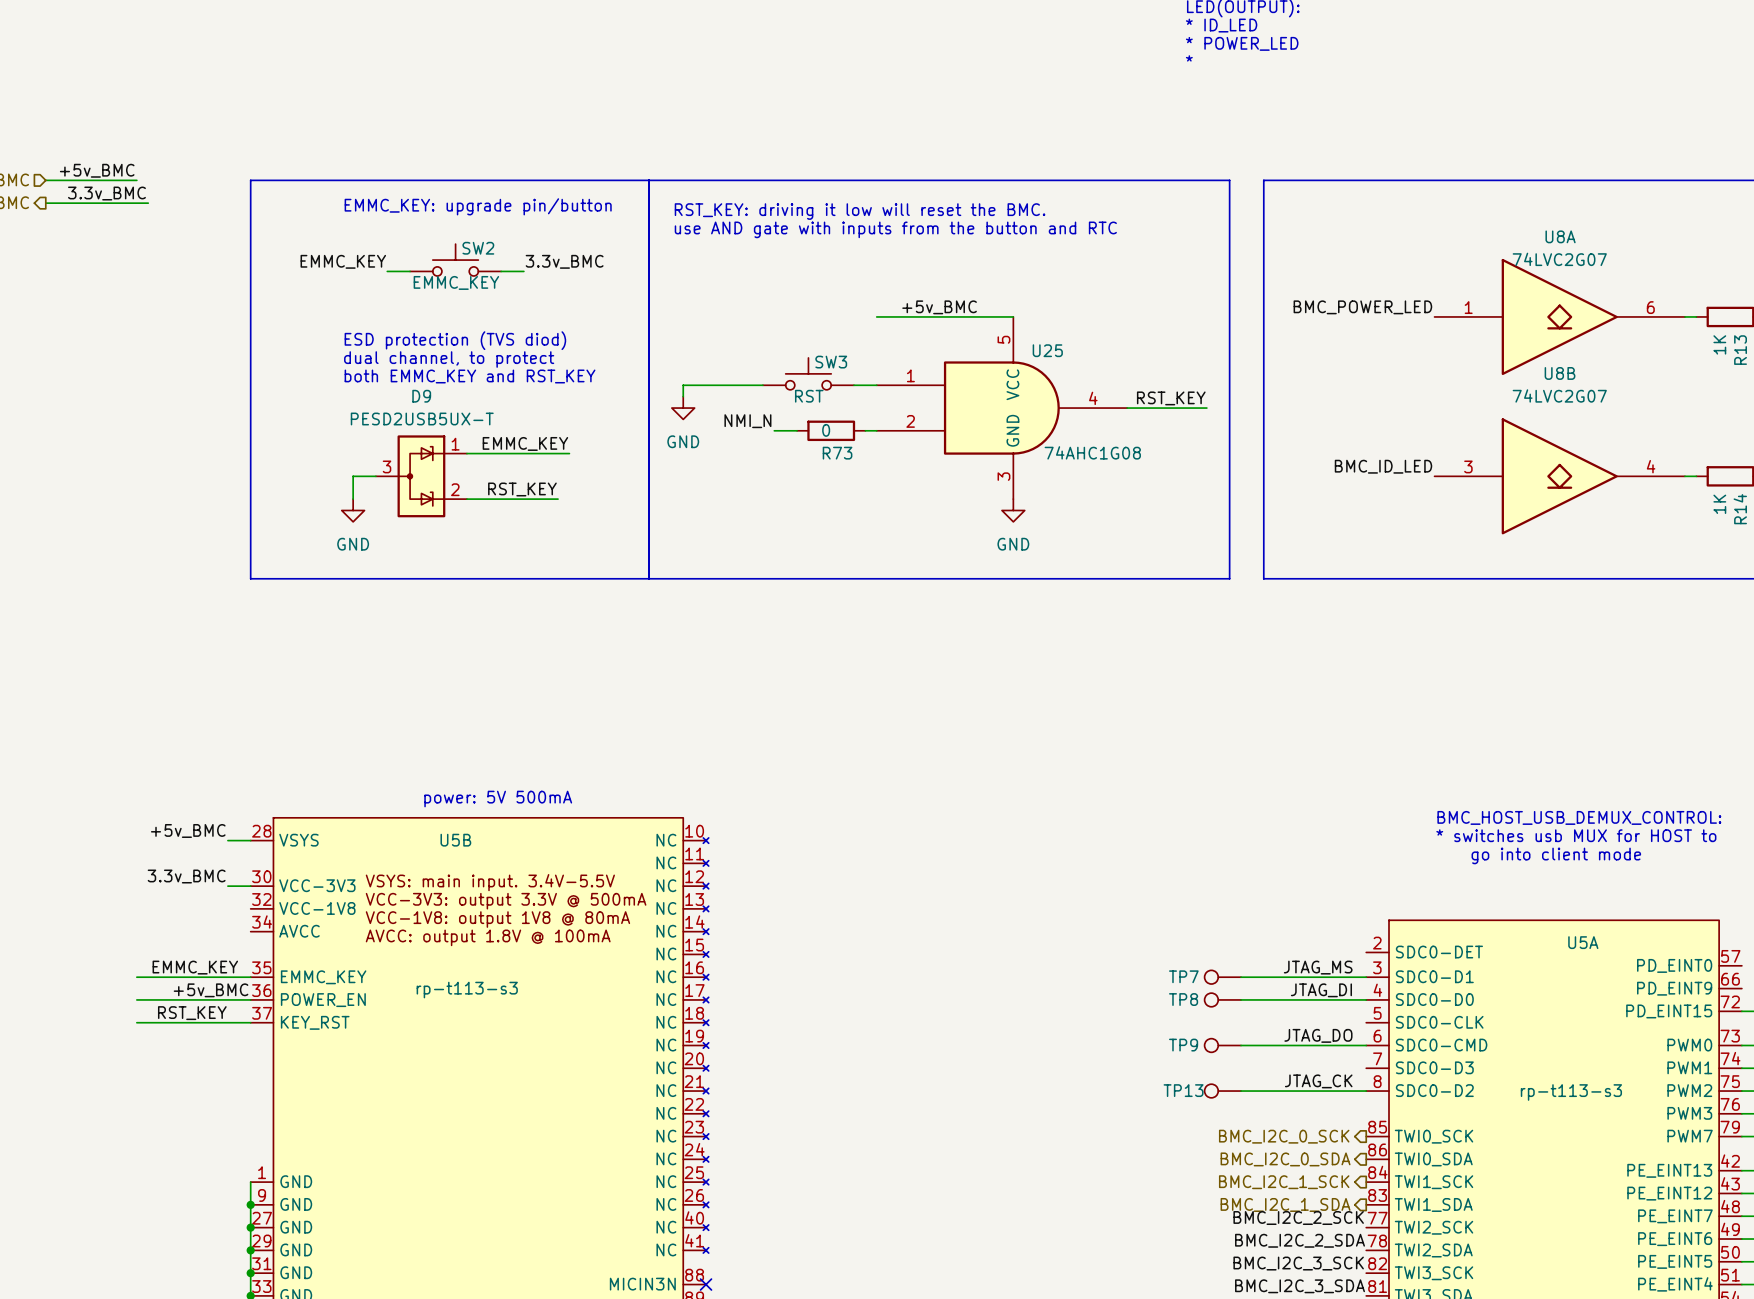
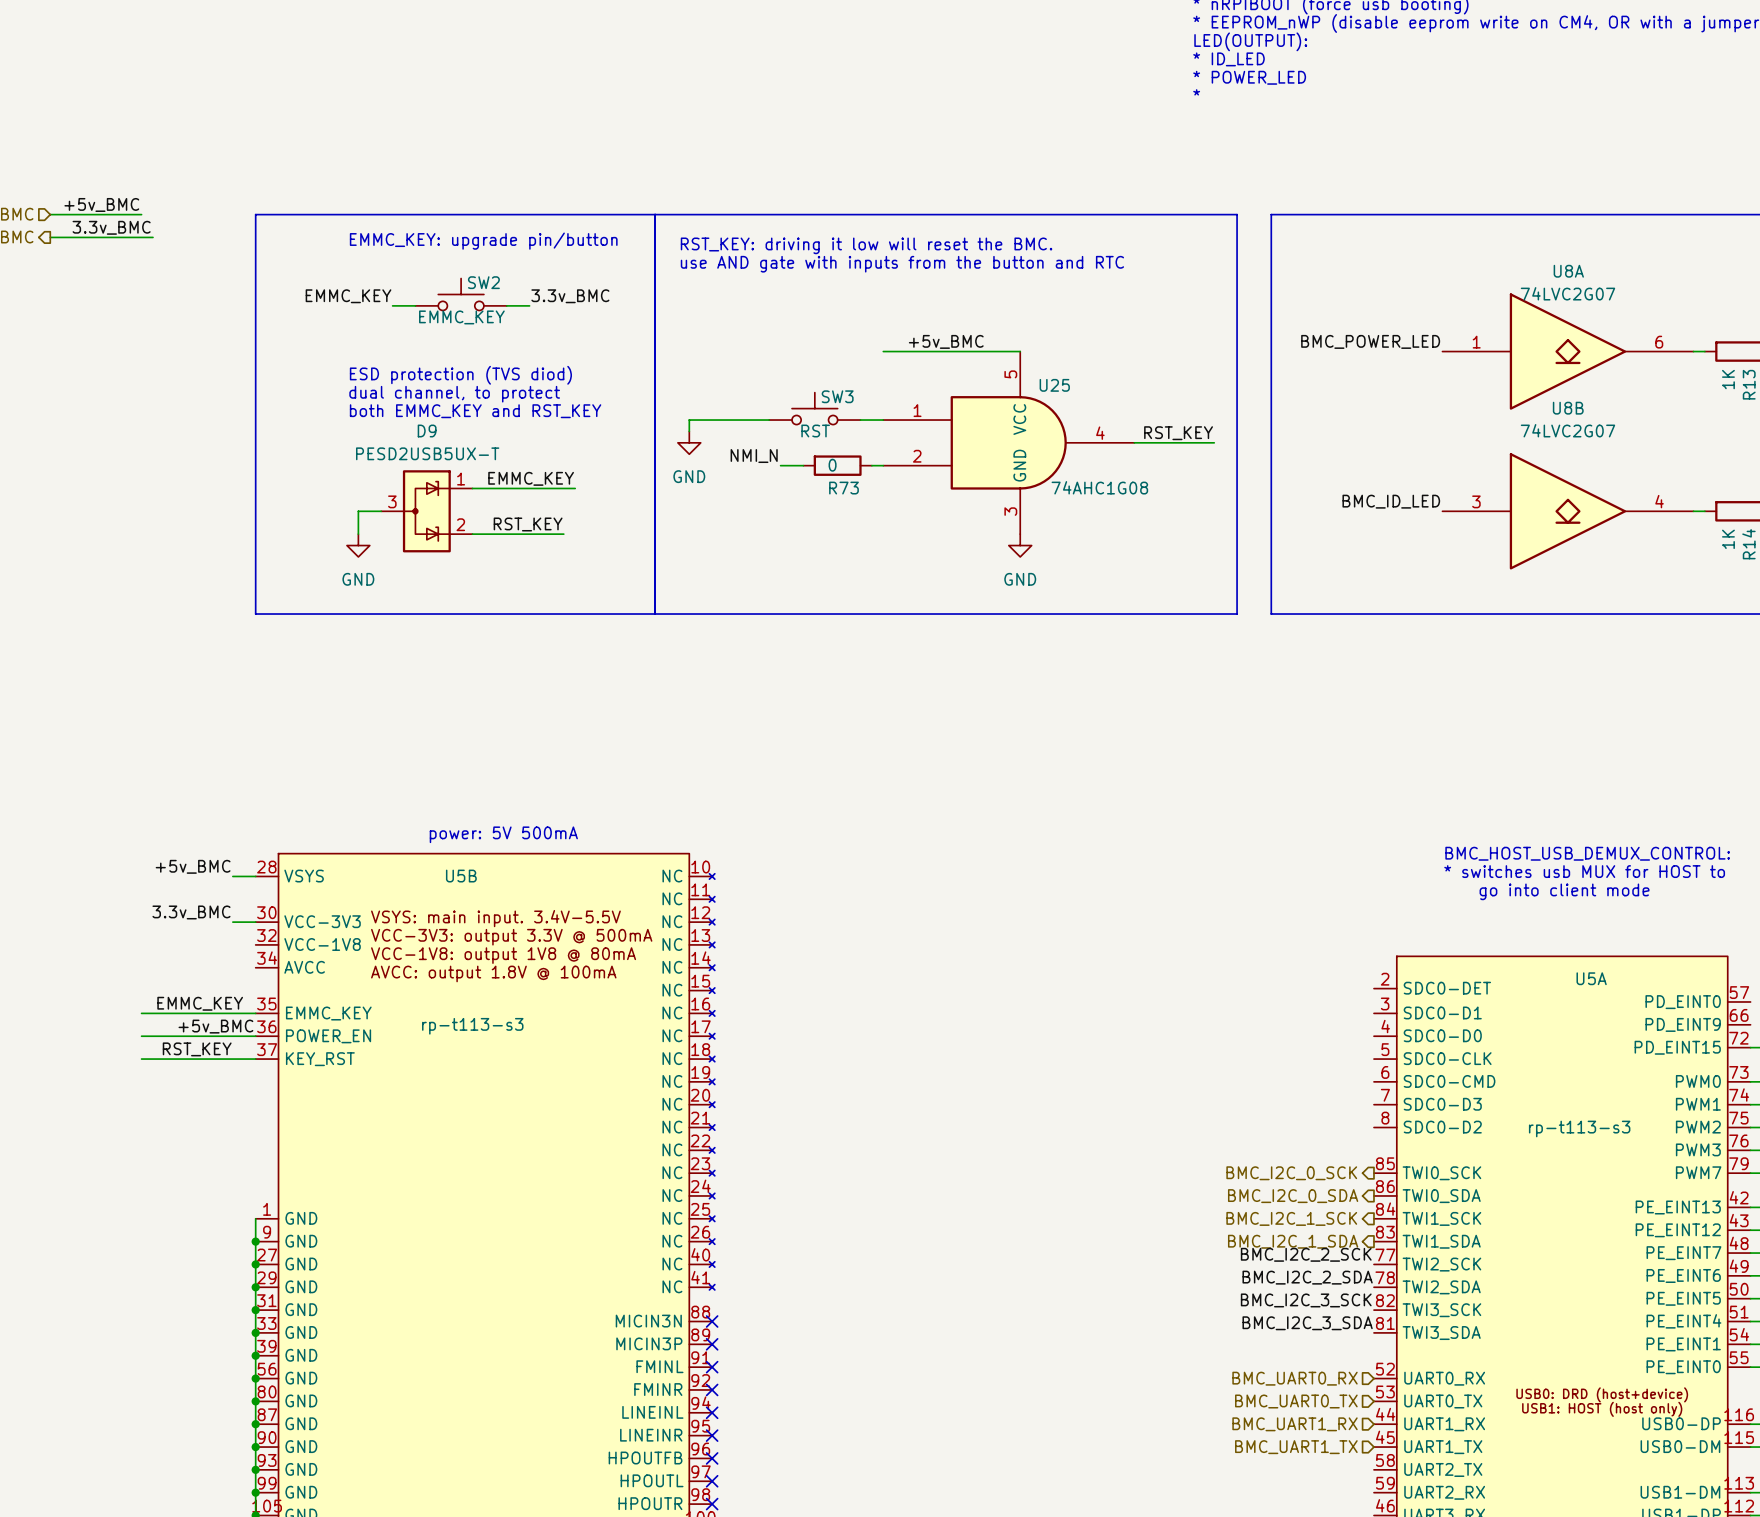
label: JTAG_MS (1318, 967) -> none
TP7: (1222, 977) -> none
wire: (1241, 977) (1366, 977) -> none
label: JTAG_DI (1321, 990) -> none
TP8: (1222, 999) -> none
wire: (1241, 999) (1366, 999) -> none
label: JTAG_DO (1318, 1035) -> none
TP9: (1222, 1045) -> none
wire: (1241, 1045) (1366, 1045) -> none
label: JTAG_CK (1318, 1081) -> none
TP13: (1222, 1091) -> none
wire: (1241, 1091) (1366, 1091) -> none

